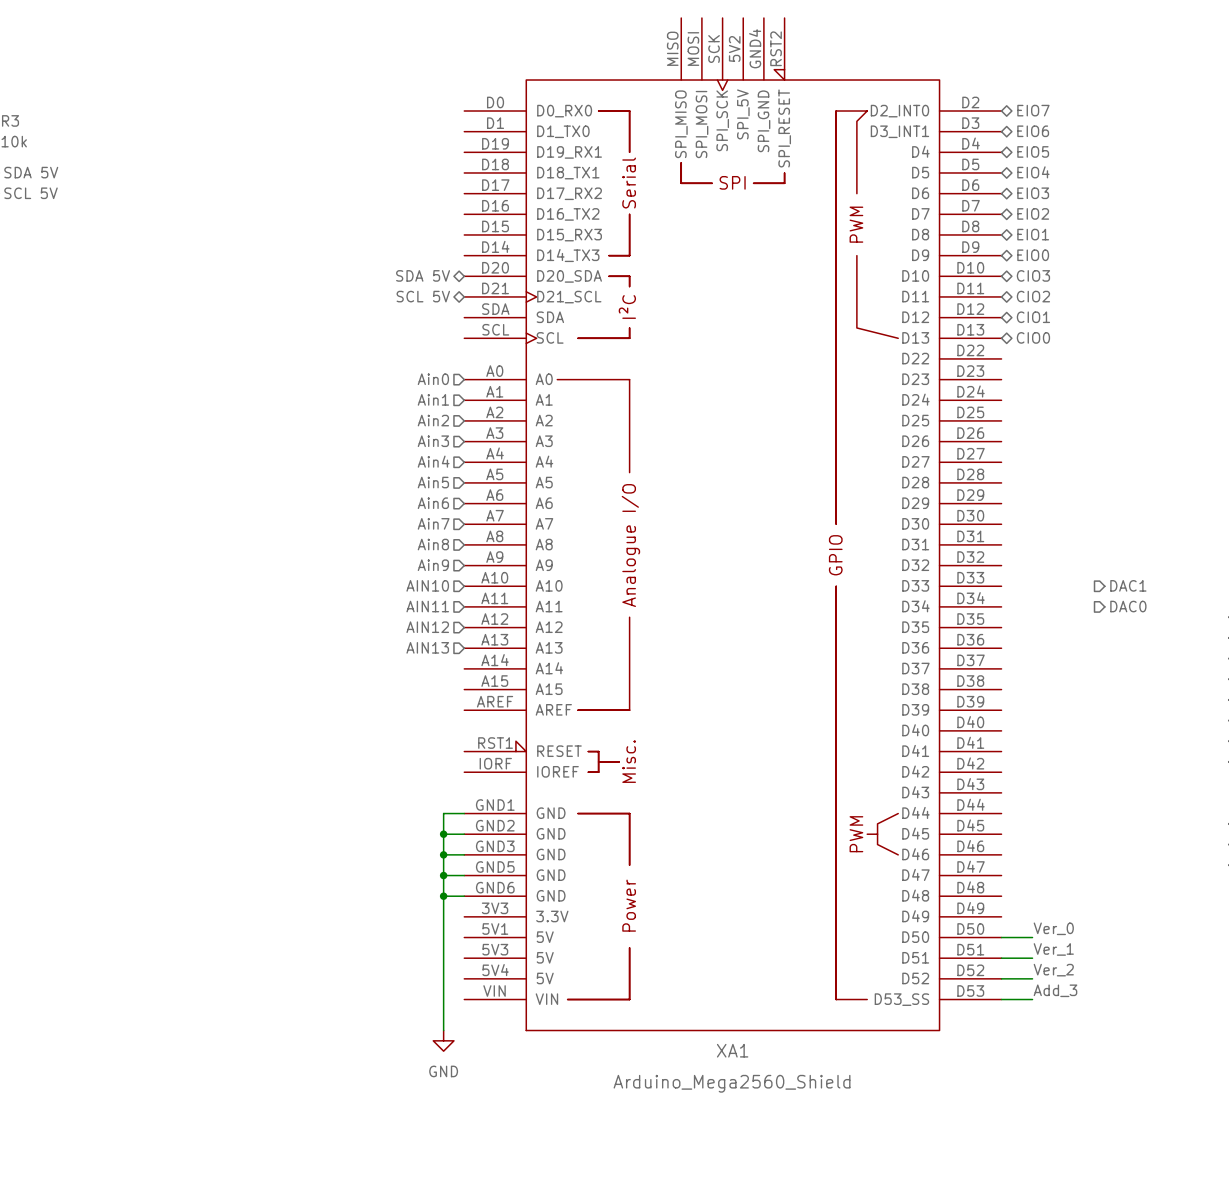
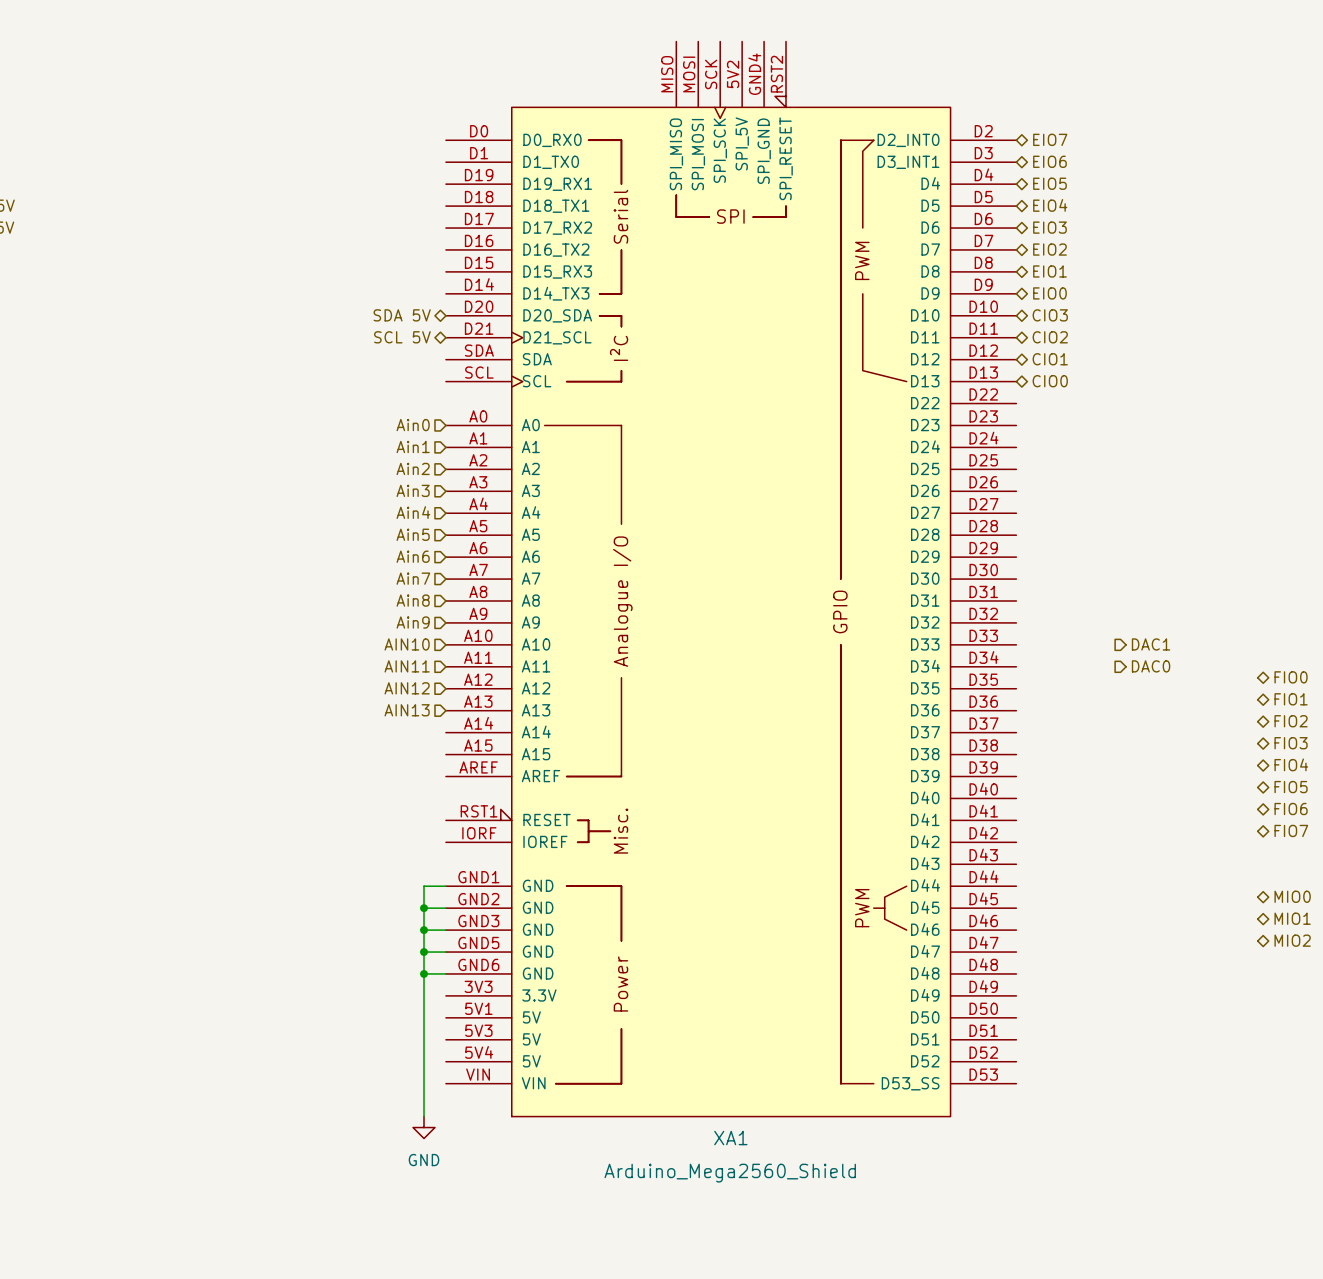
label: Ver_0 (1053, 928) -> none
wire: (1001, 937) (1032, 937) -> none
label: Ver_1 (1053, 949) -> none
wire: (1001, 958) (1032, 958) -> none
label: Ver_2 (1053, 970) -> none
wire: (1001, 978) (1032, 978) -> none
label: Add_3 (1055, 990) -> none
wire: (1001, 999) (1032, 999) -> none

